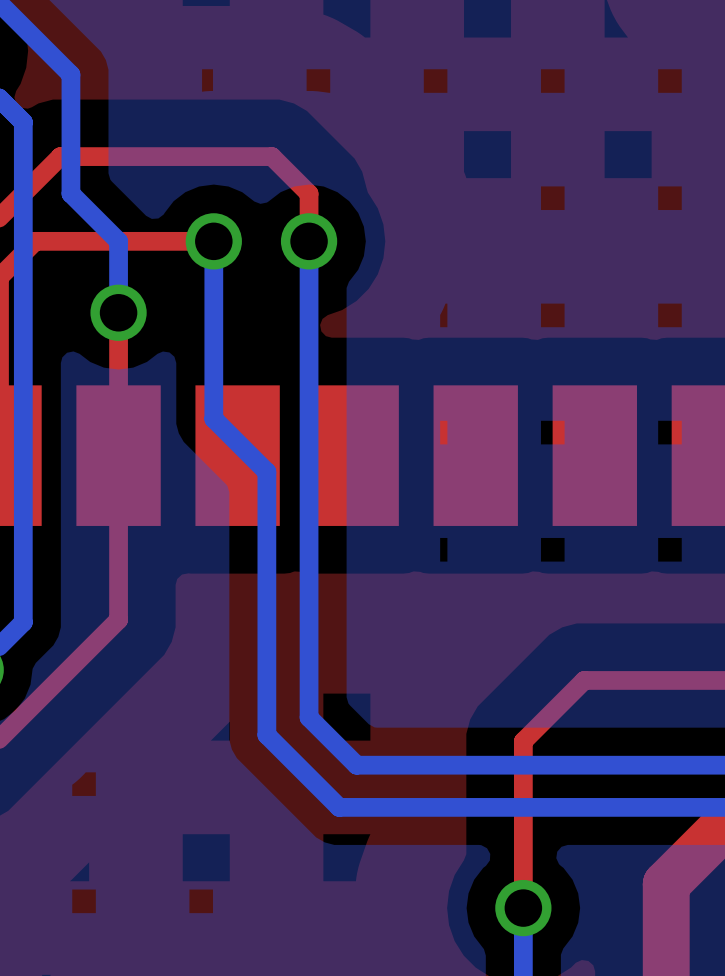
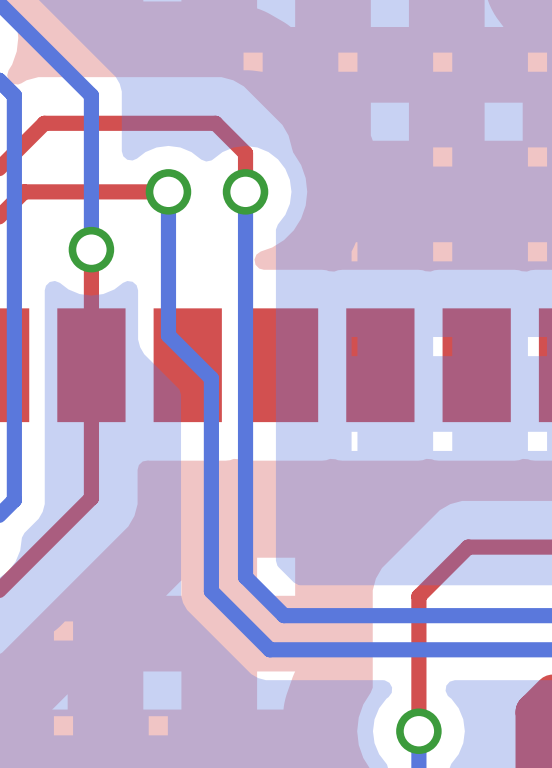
bottom track: (70, 74) (70, 193) (118, 241) -> (52, 57) (91, 95) (91, 191)

